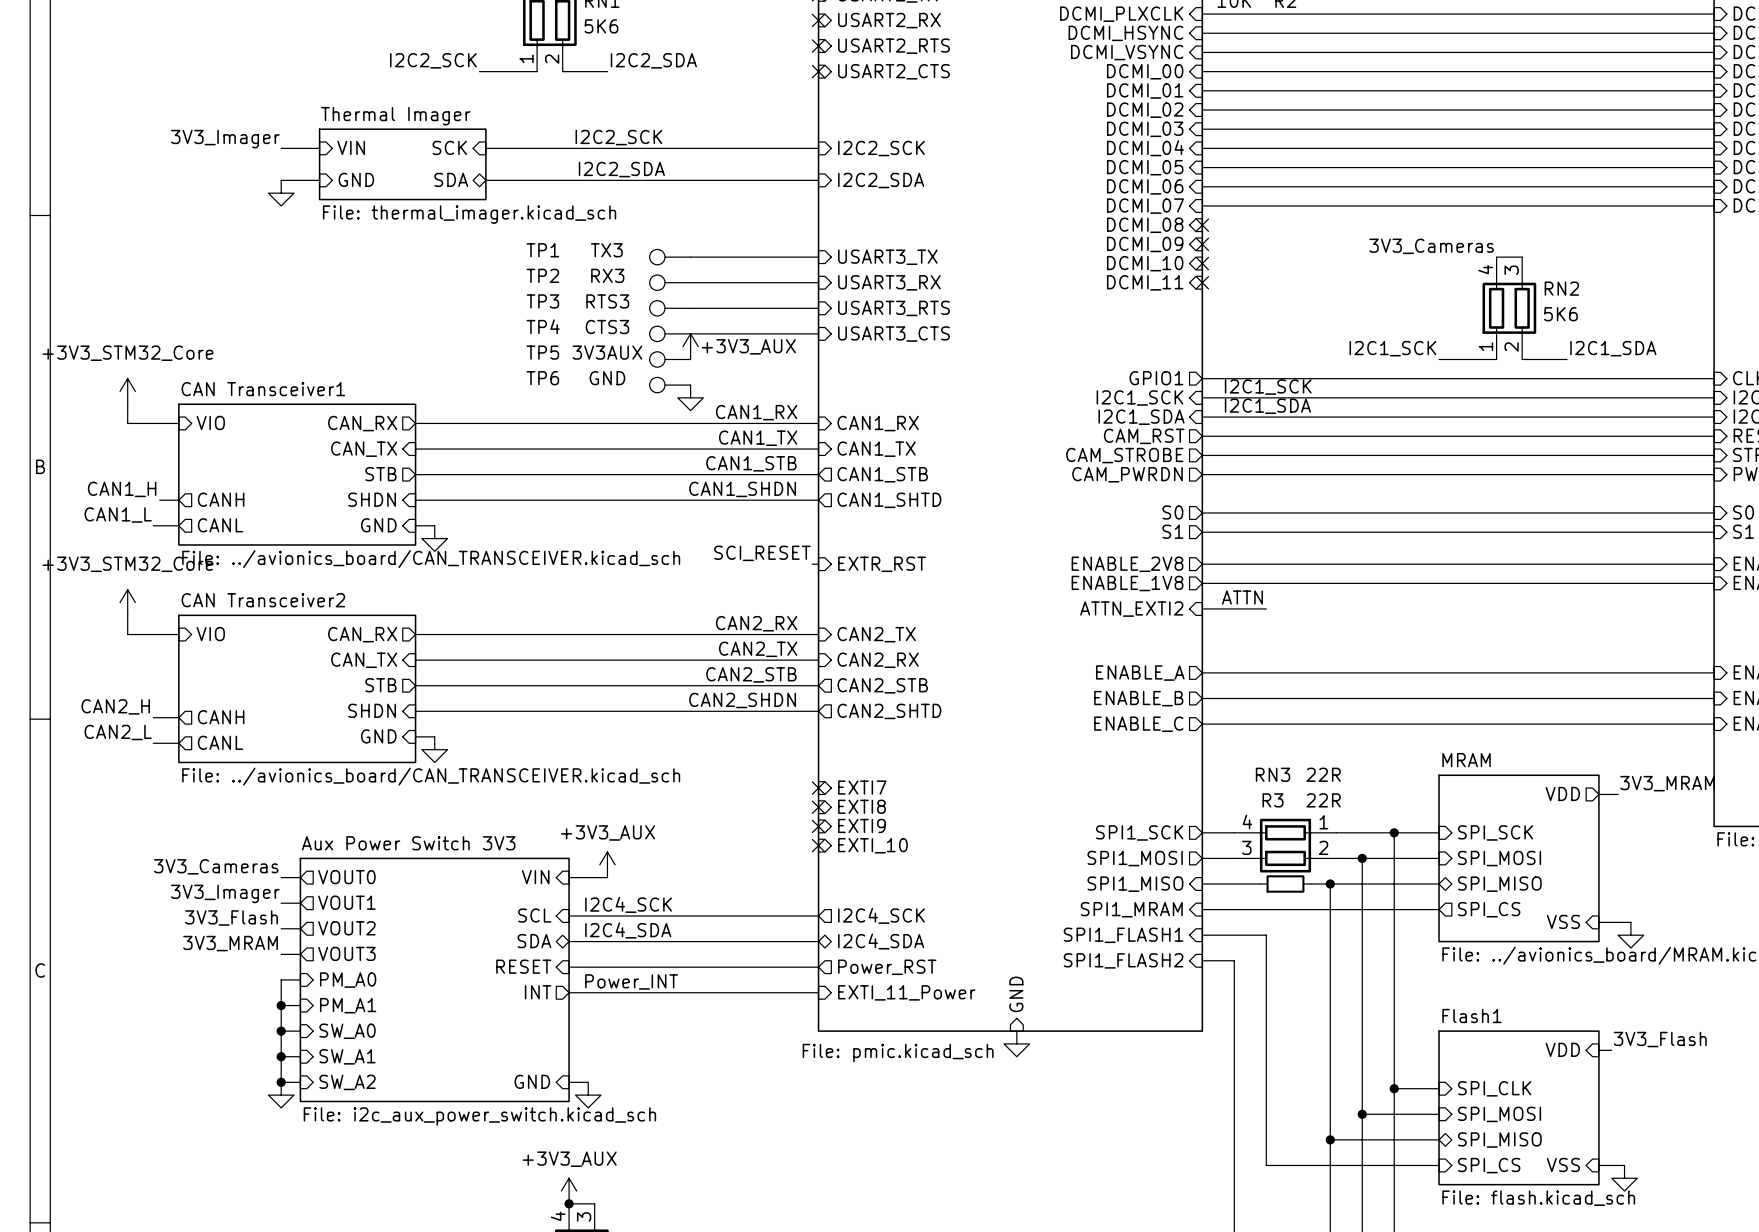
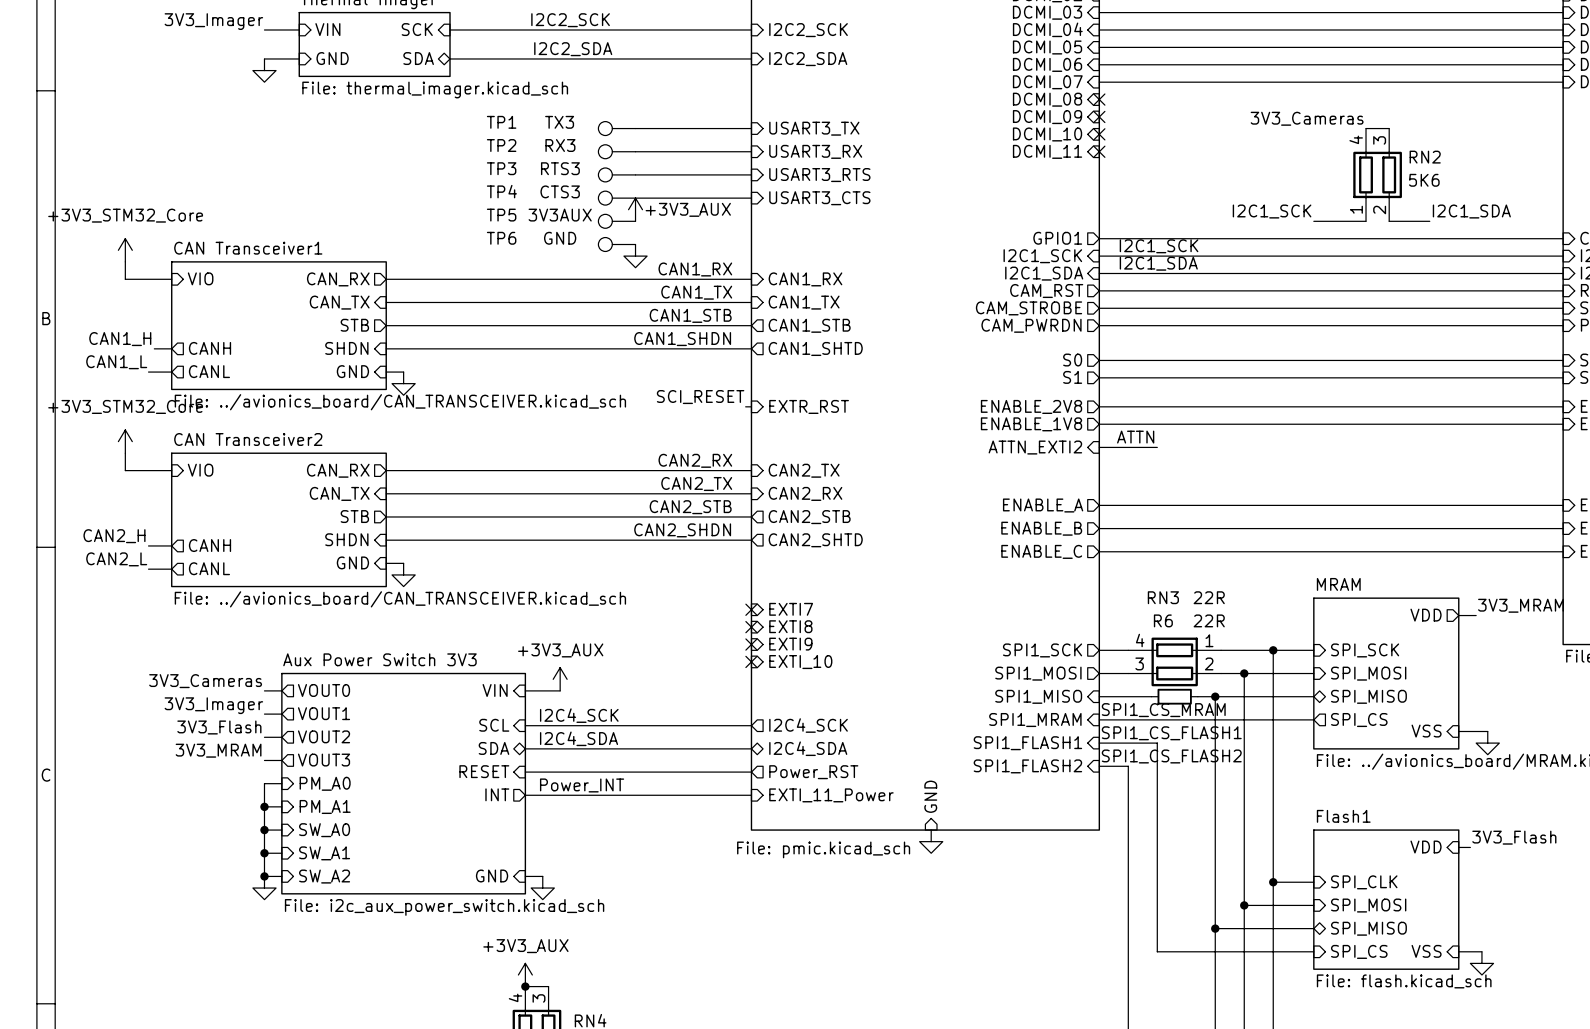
R3 name: R3 (1273, 800) -> R6 (1163, 620)
label: none -> SPI1_CS_MRAM (1163, 710)
label: none -> SPI1_CS_FLASH1 (1171, 733)
label: none -> SPI1_CS_FLASH2 (1171, 756)

